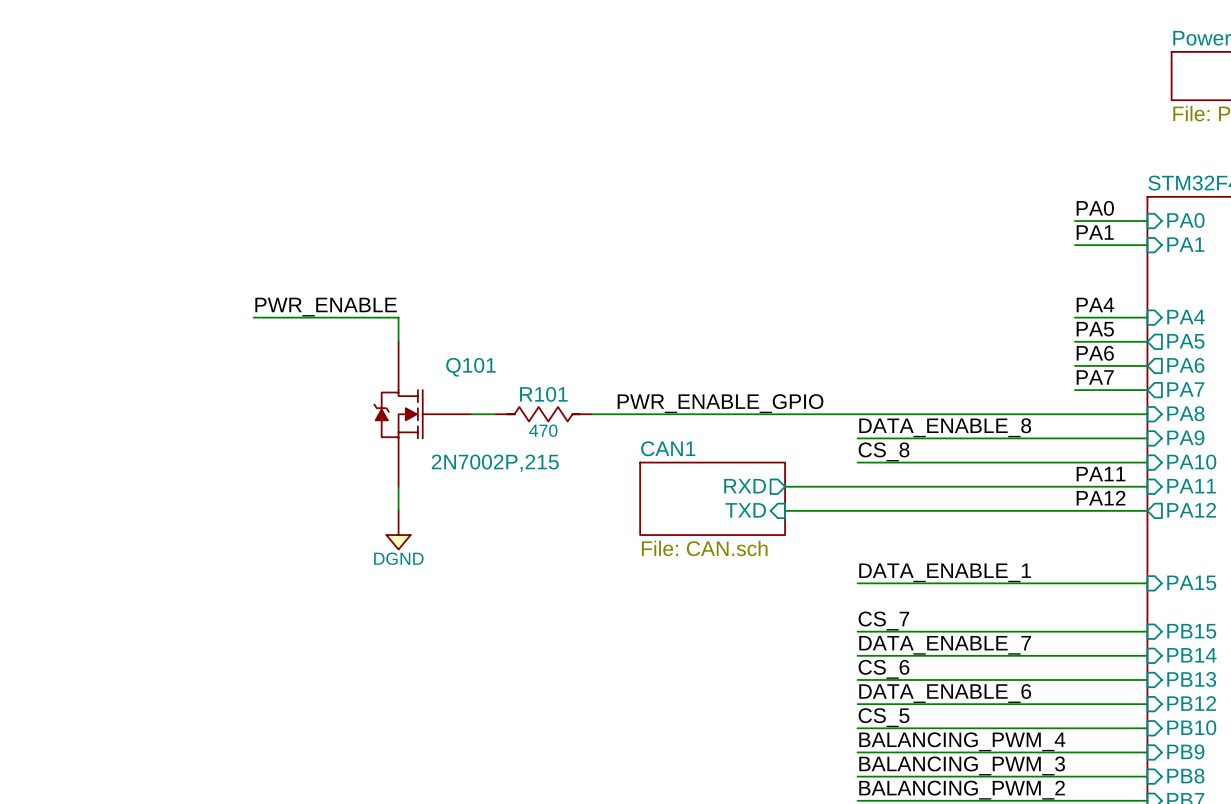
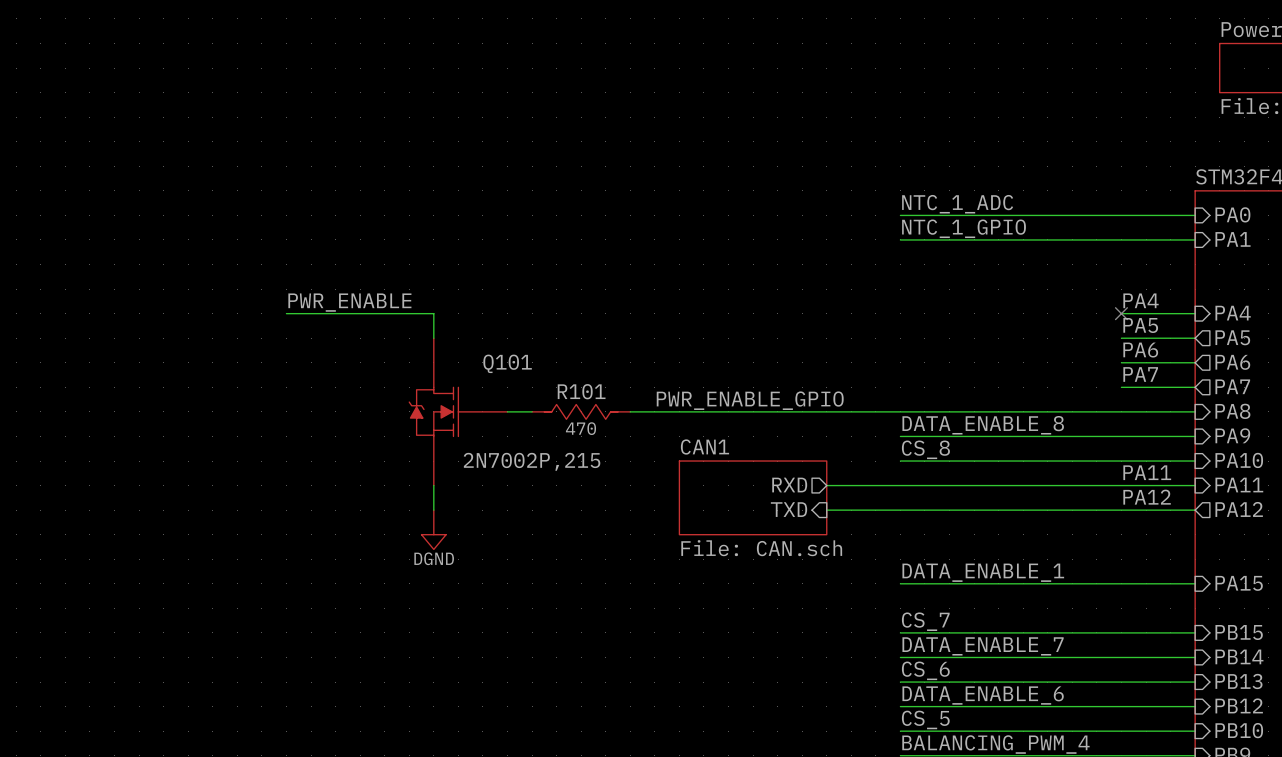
label: PA0 (1095, 208) -> none
label: none -> NTC_1_ADC (957, 204)
wire: none -> (900, 215) (1121, 215)
label: PA1 (1095, 232) -> none
label: none -> NTC_1_GPIO (964, 228)
wire: none -> (900, 239) (1121, 239)
no-connect mark: none -> (1121, 313)

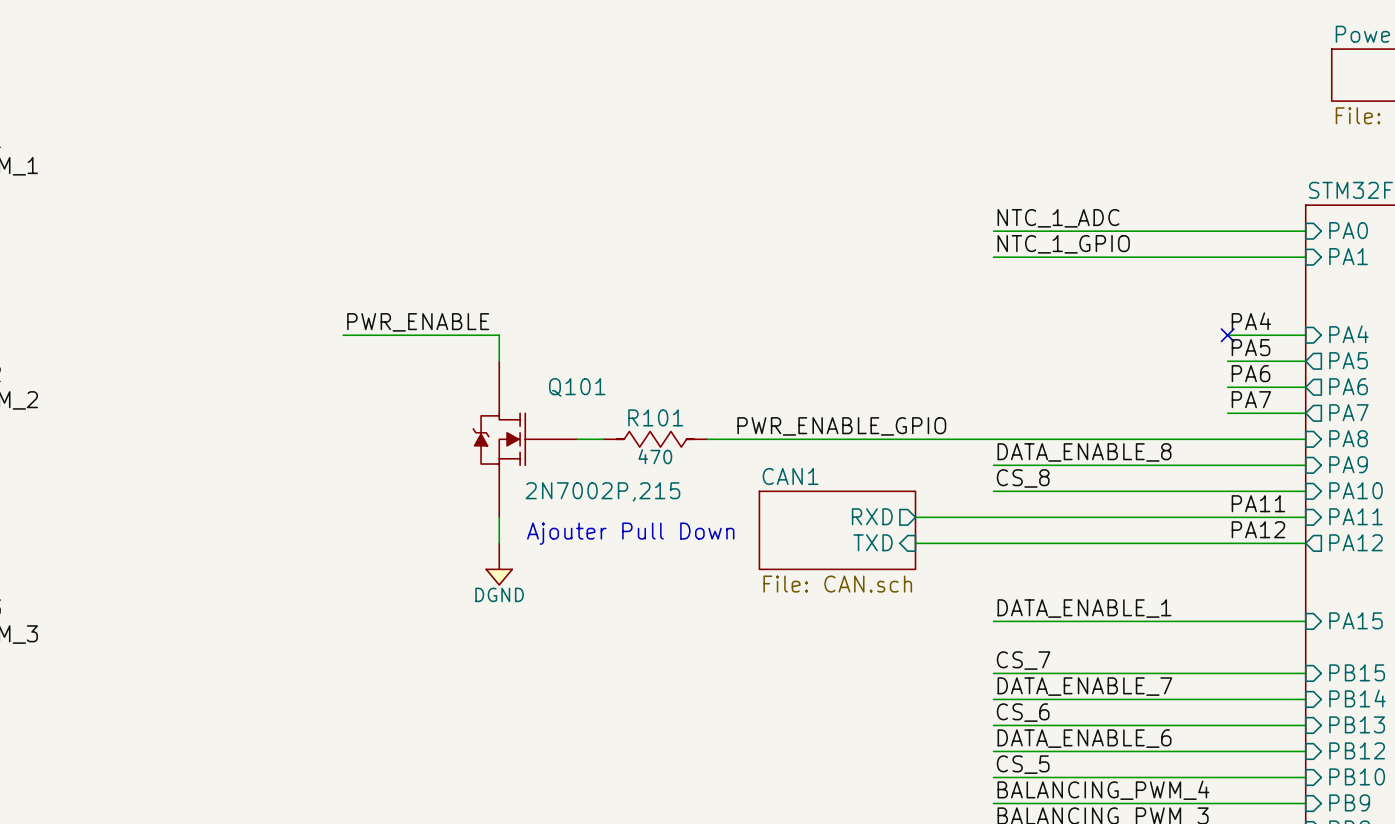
text: none -> Ajouter Pull Down (630, 533)

